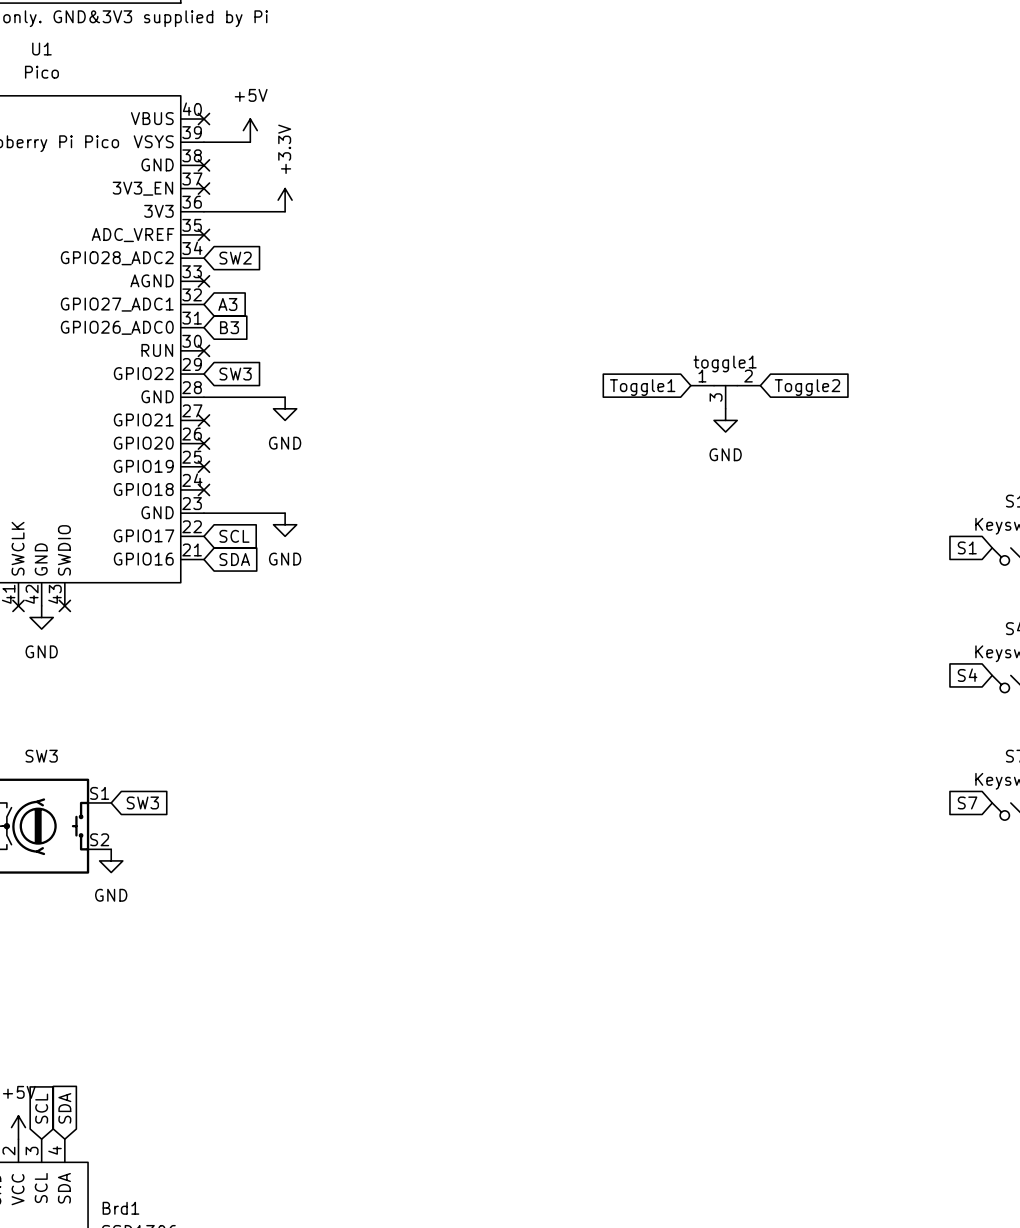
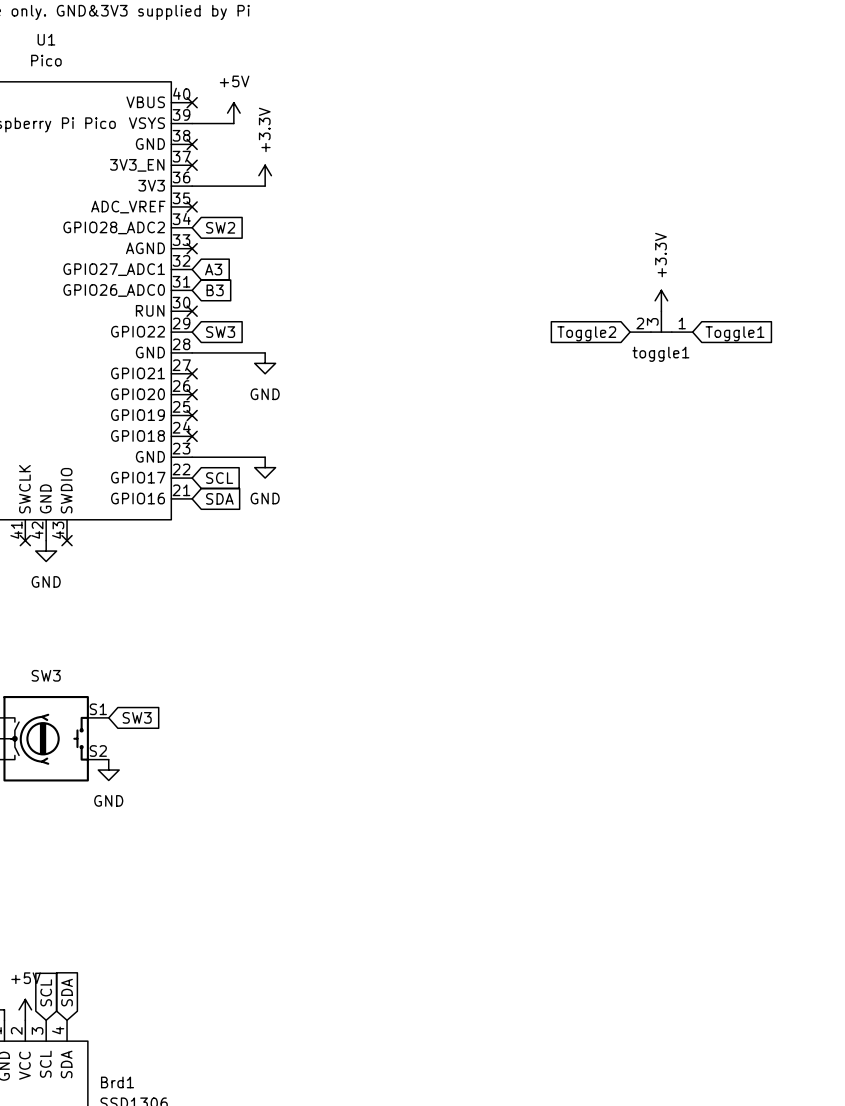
power symbol: none -> +3.3V (661, 300)
toggle1 rotation: 0° (725, 385) -> 180° (661, 332)
global label rotation: 0° (642, 387) -> 180° (735, 333)
global label position: Toggle1 (642, 387) -> Toggle1 (735, 333)
global label rotation: 0° (807, 387) -> 180° (586, 333)
global label position: Toggle2 (807, 387) -> Toggle2 (586, 333)
power symbol: GND (725, 420) -> none

